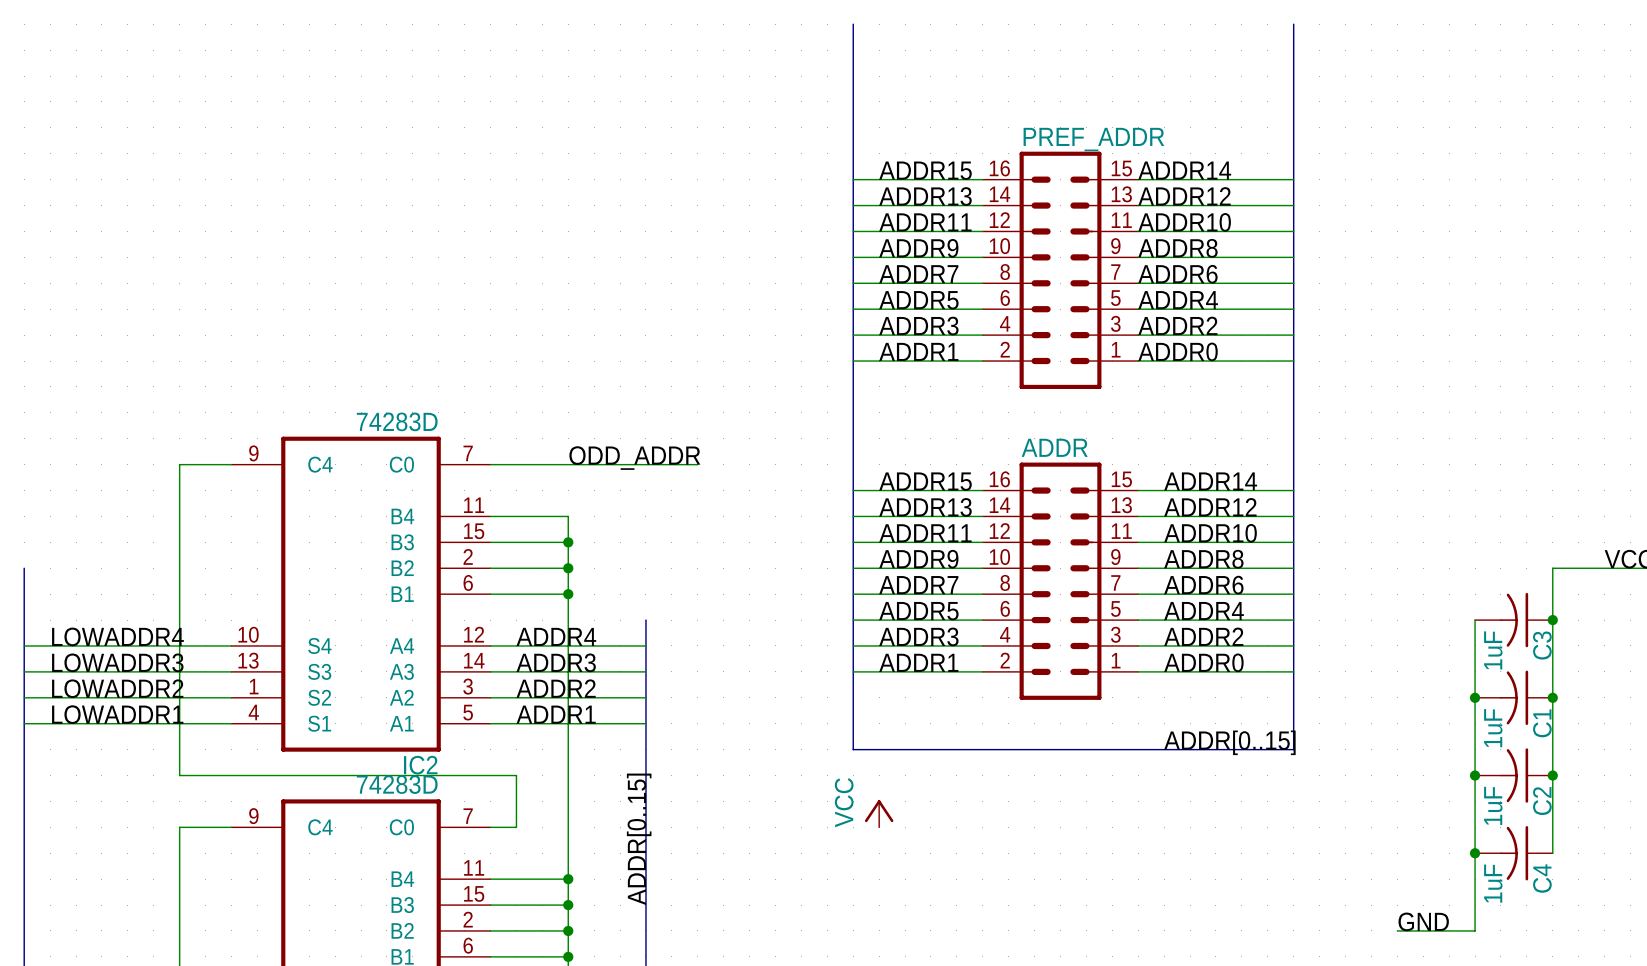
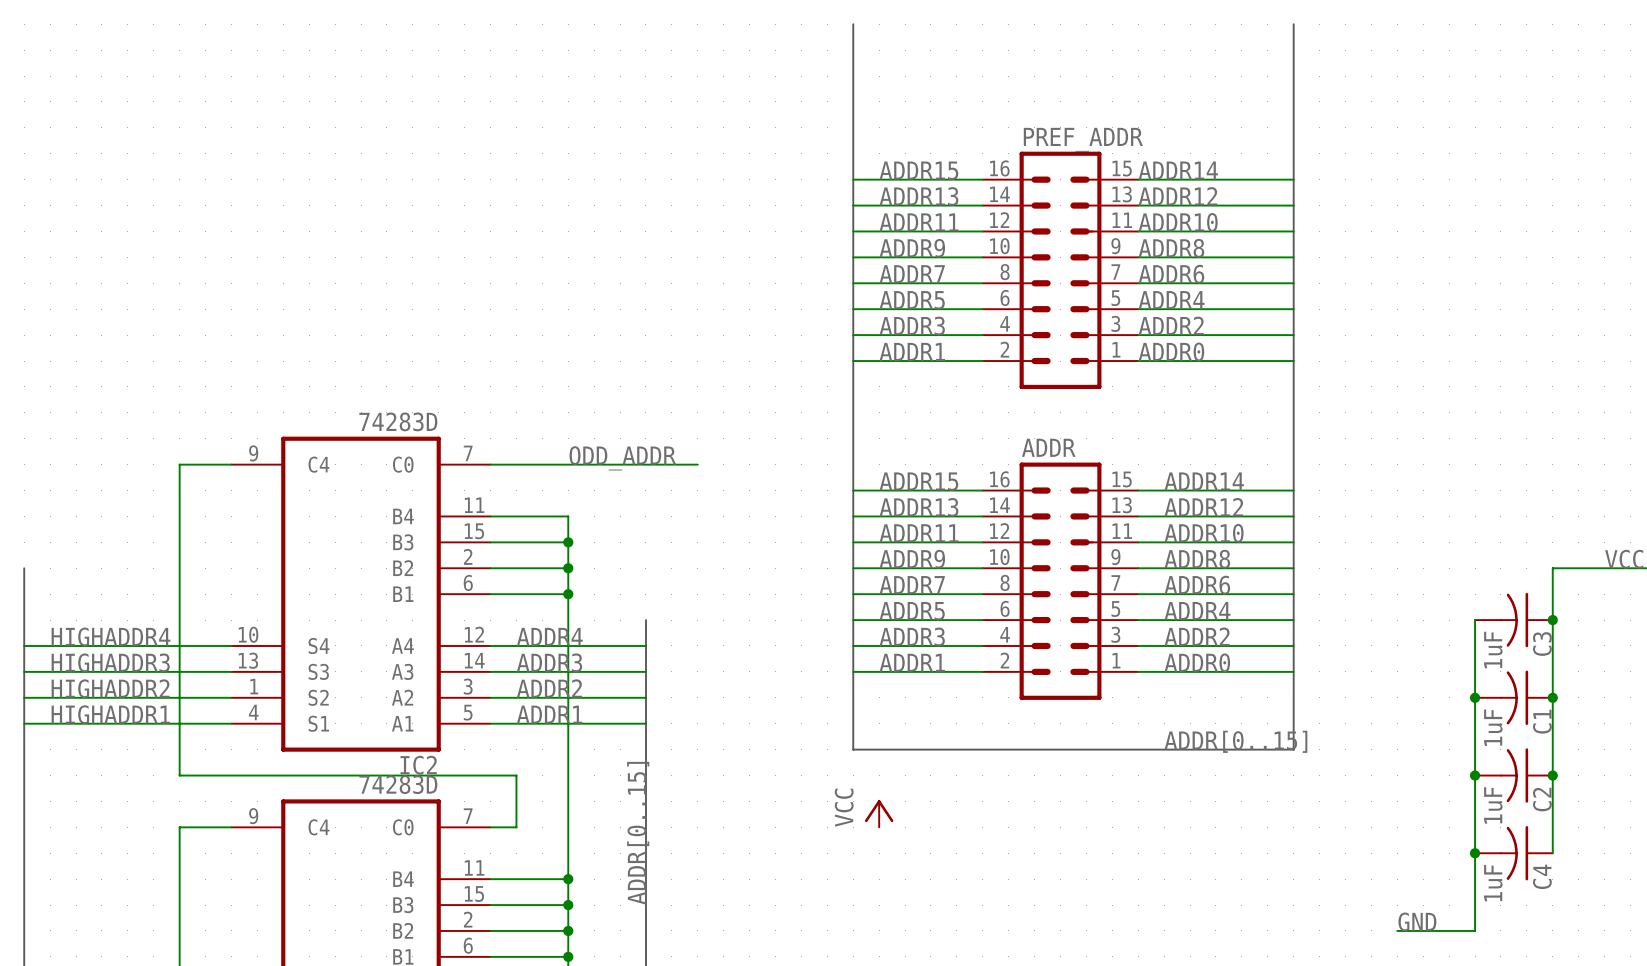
label: LOWADDR4 (117, 636) -> HIGHADDR4 (110, 636)
label: LOWADDR3 (117, 662) -> HIGHADDR3 (110, 662)
label: LOWADDR2 (117, 688) -> HIGHADDR2 (110, 688)
label: LOWADDR1 (117, 714) -> HIGHADDR1 (110, 714)

